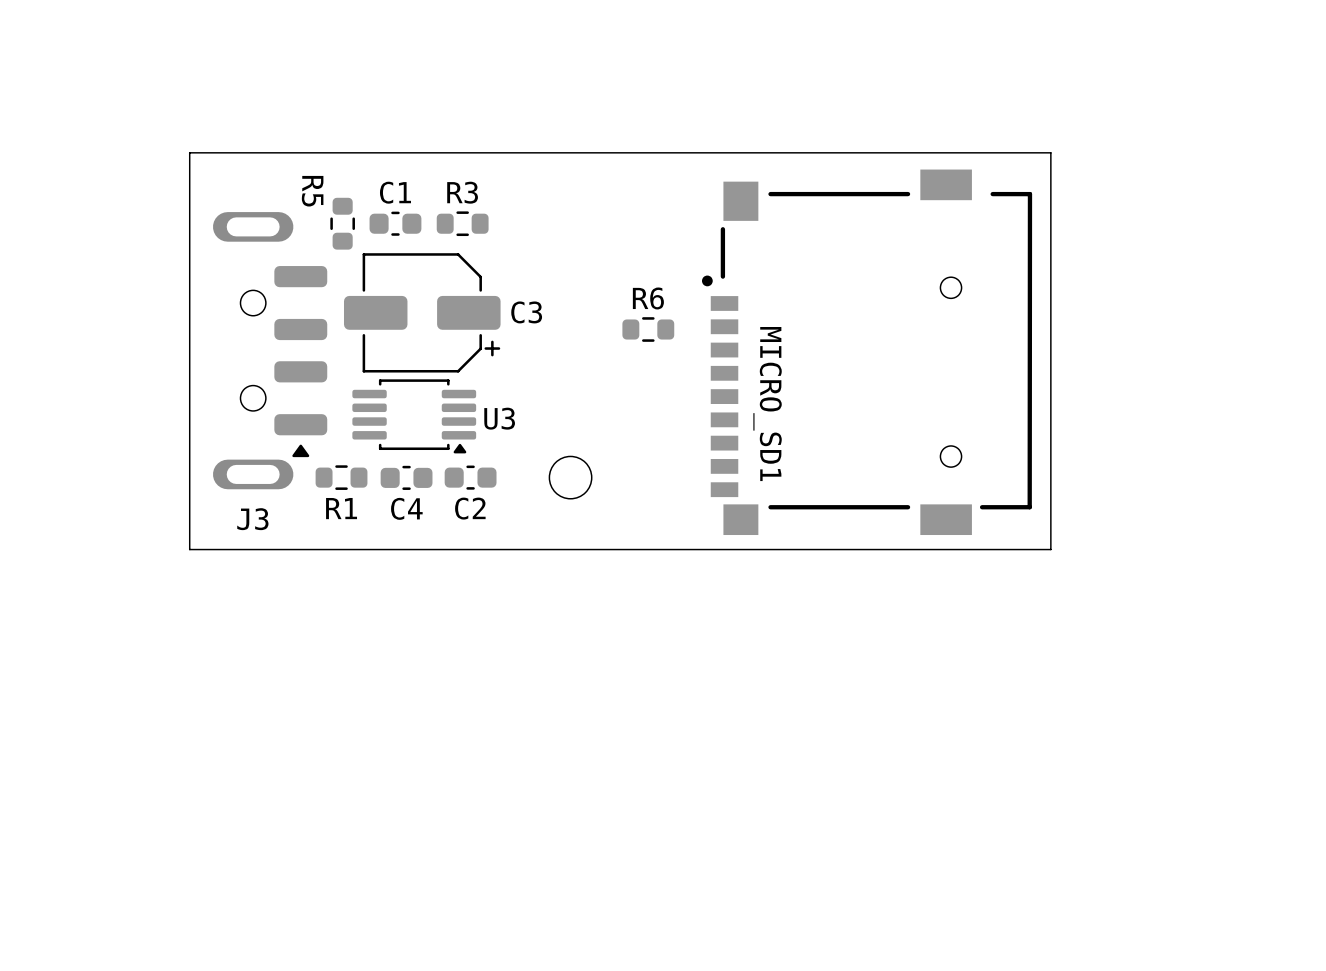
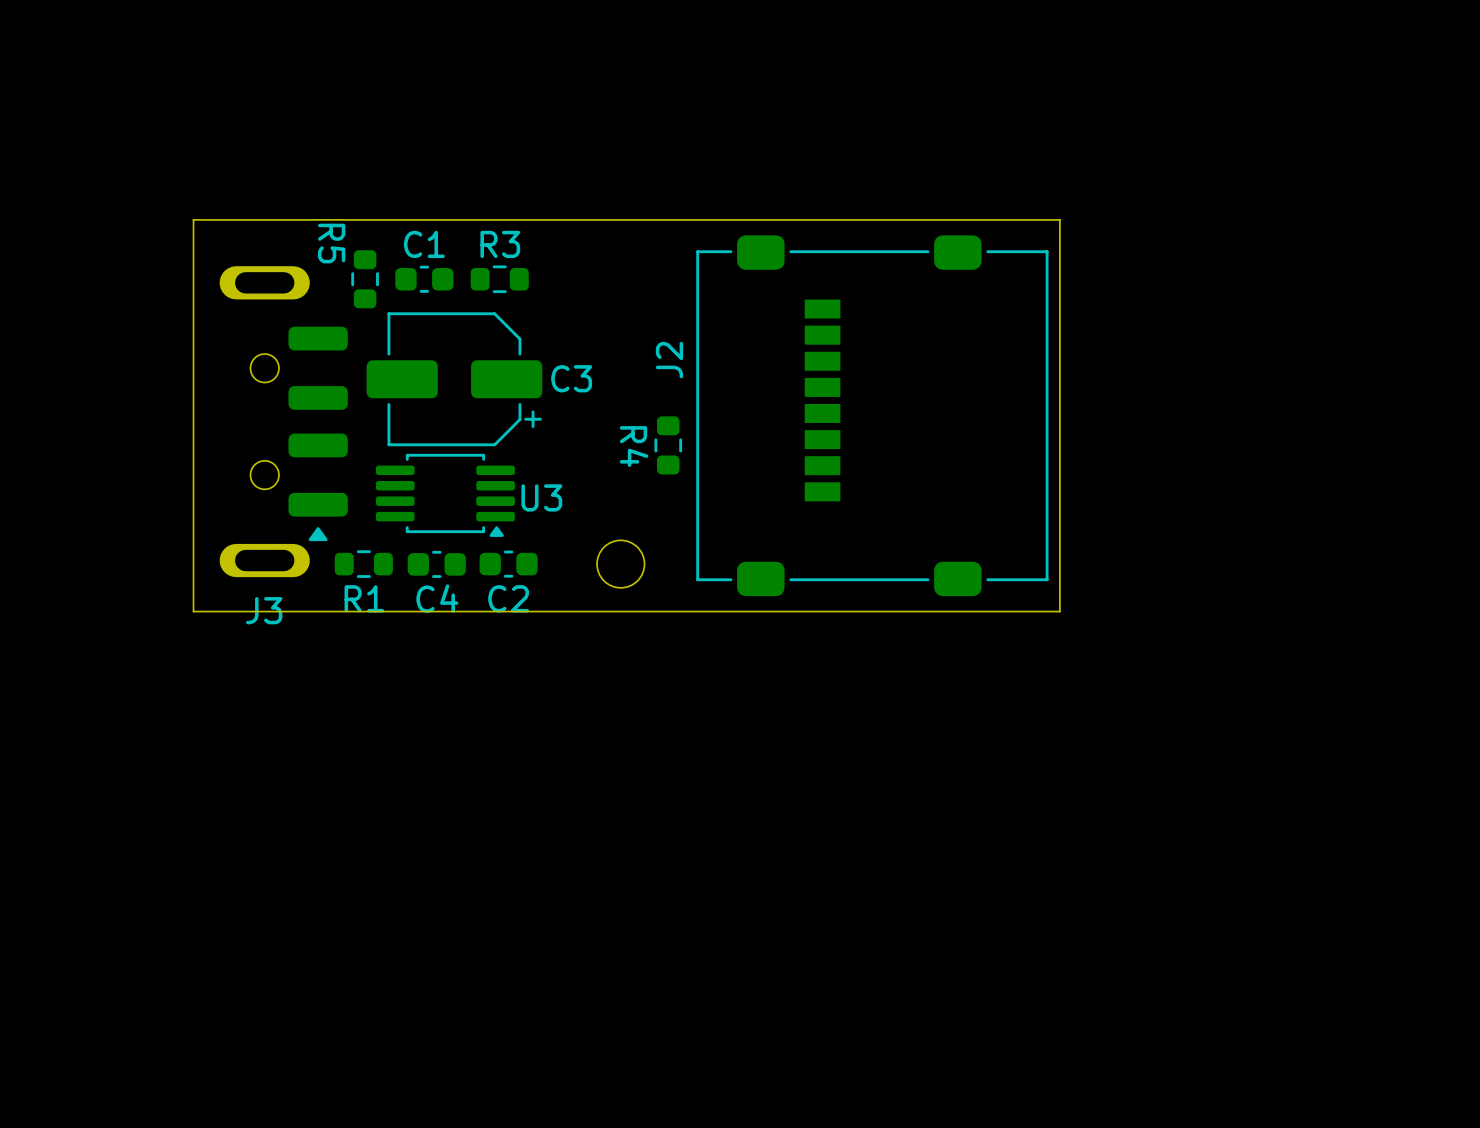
board edge: (189, 170) (189, 152) (1050, 152) (1050, 549) (189, 549) (189, 519) -> (193, 219) (1059, 219) (1059, 611) (193, 611)
R6: (648, 329) -> none
J2: none -> (872, 415)
MICRO_SD1: (867, 352) -> none
R4: none -> (668, 445)

